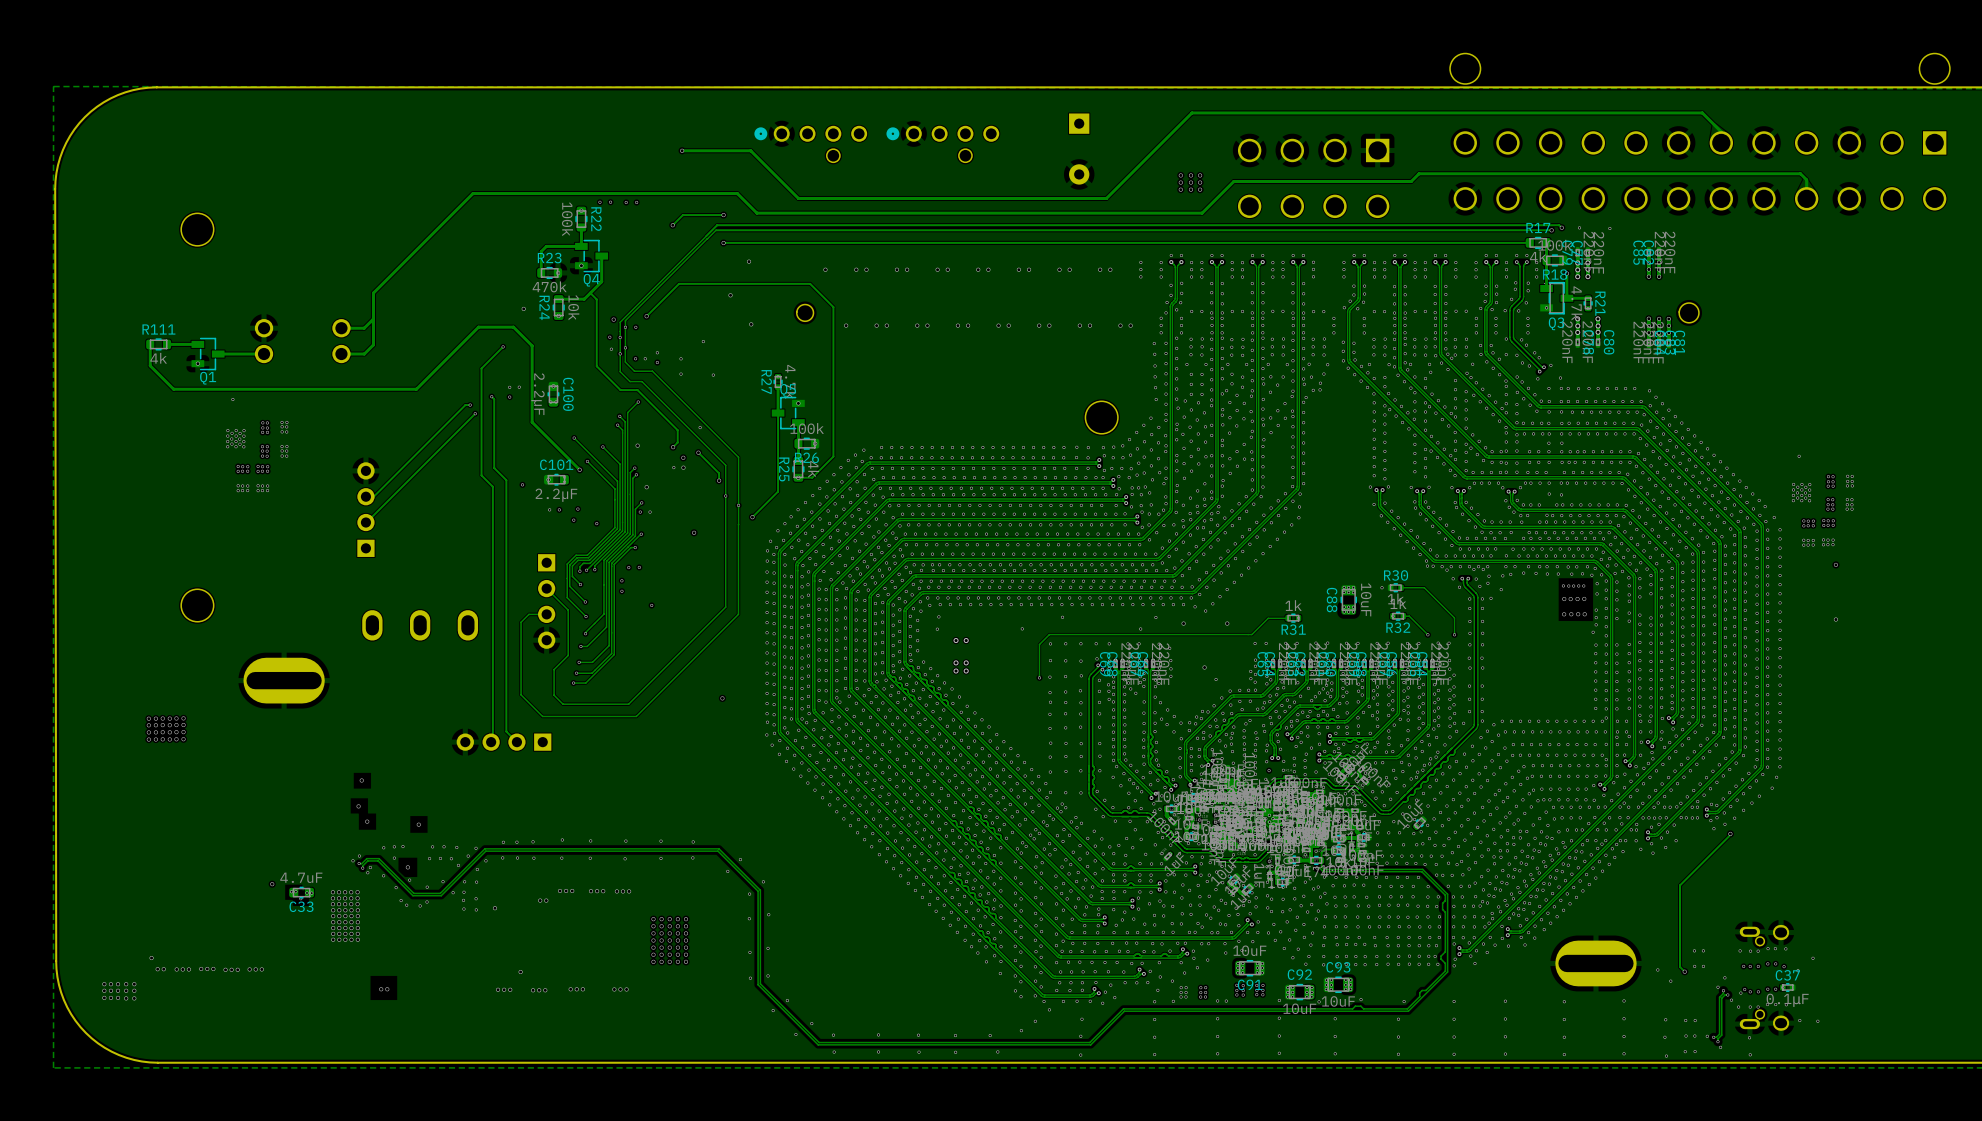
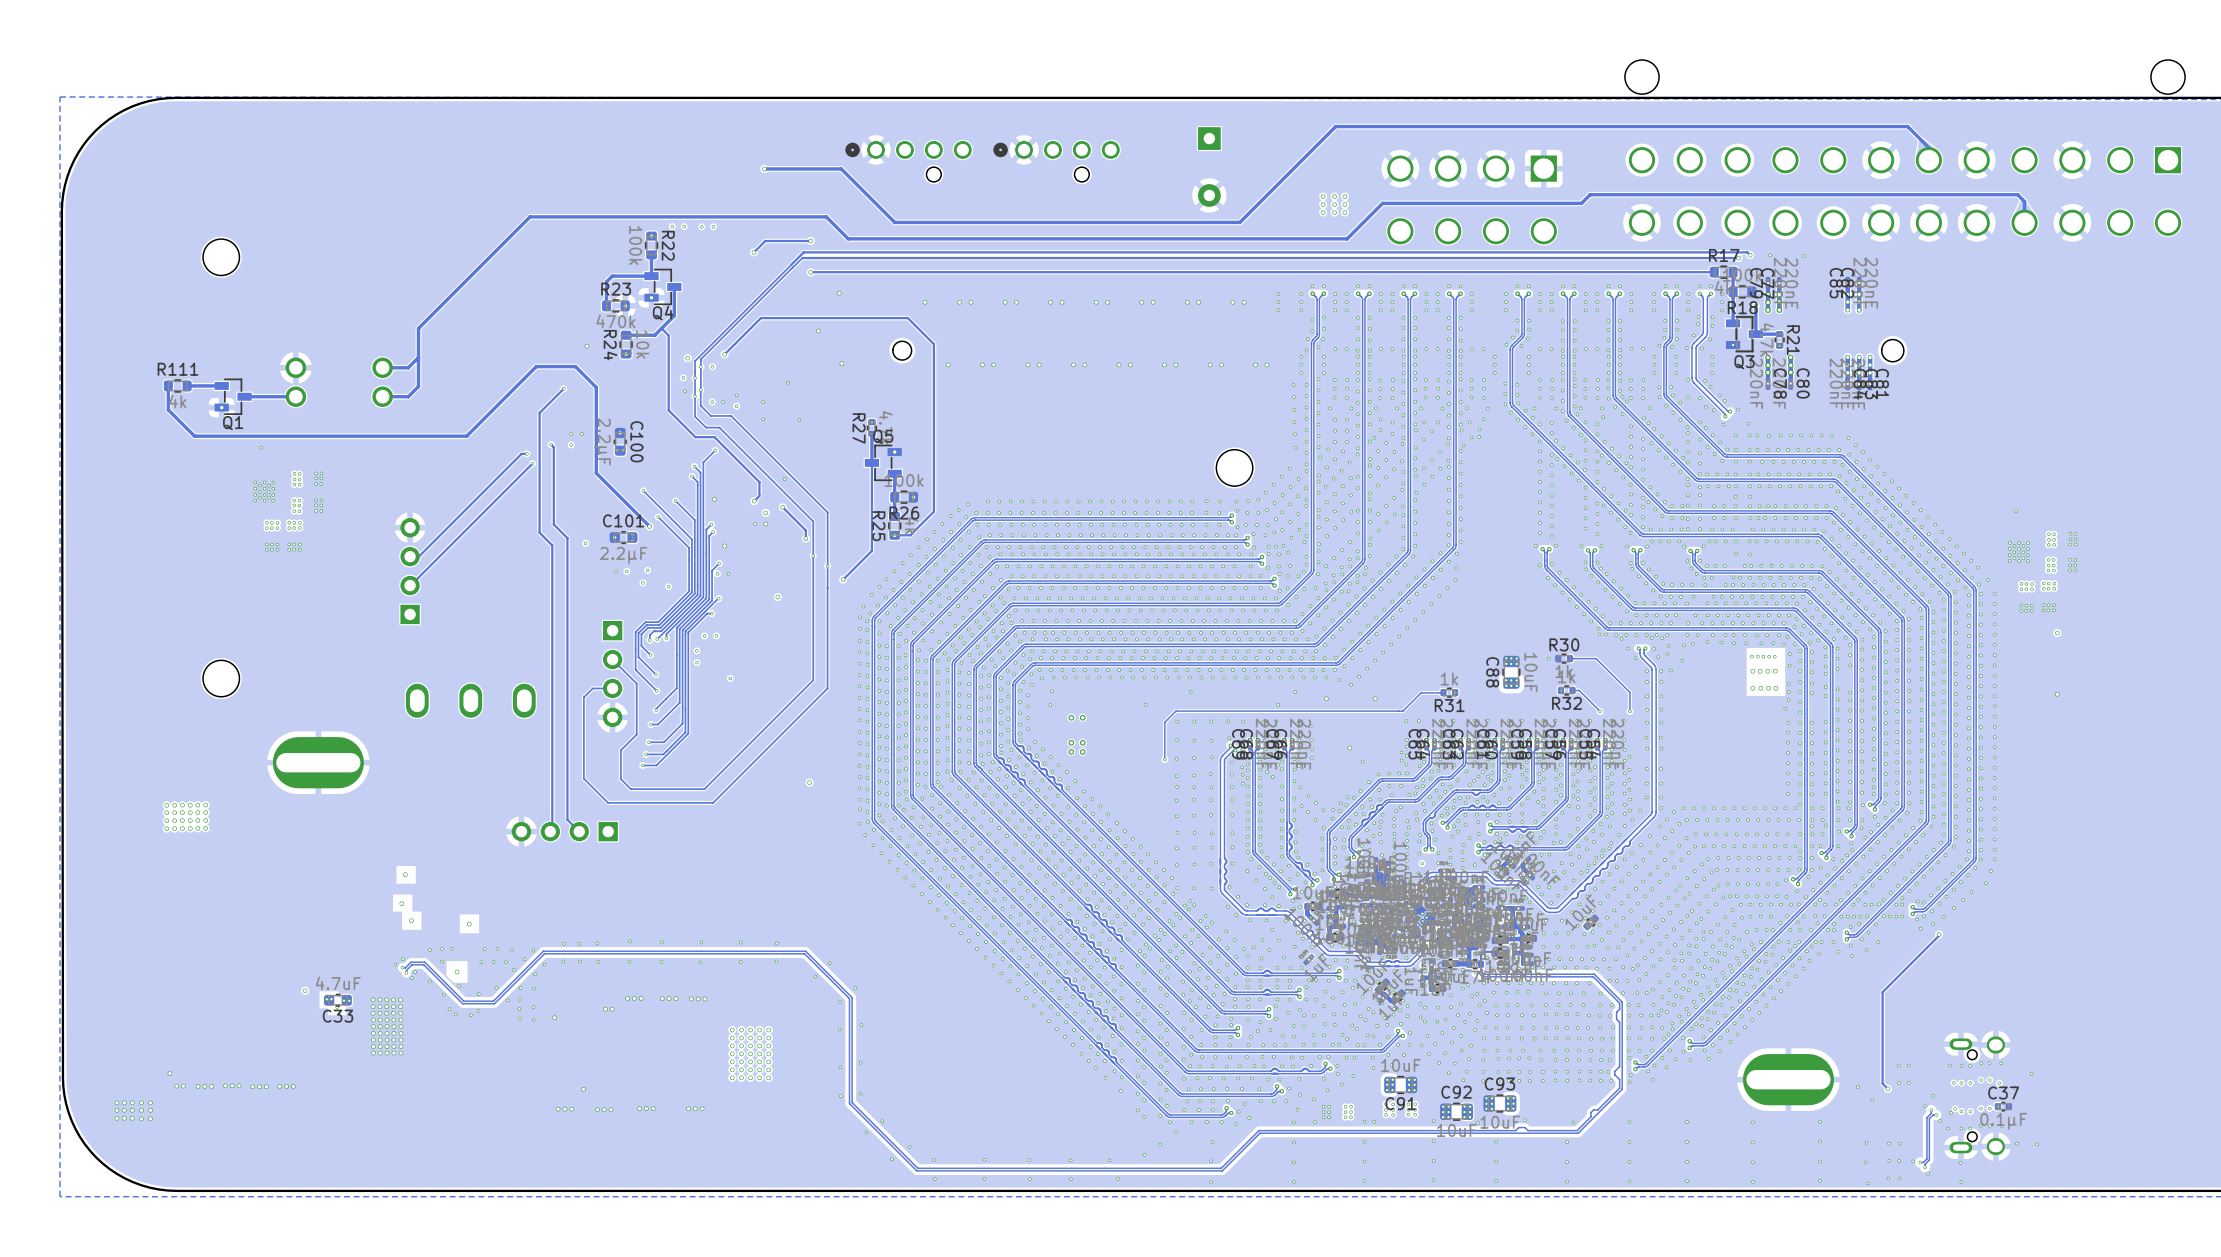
via: (381, 989) -> none
via: (387, 989) -> none

